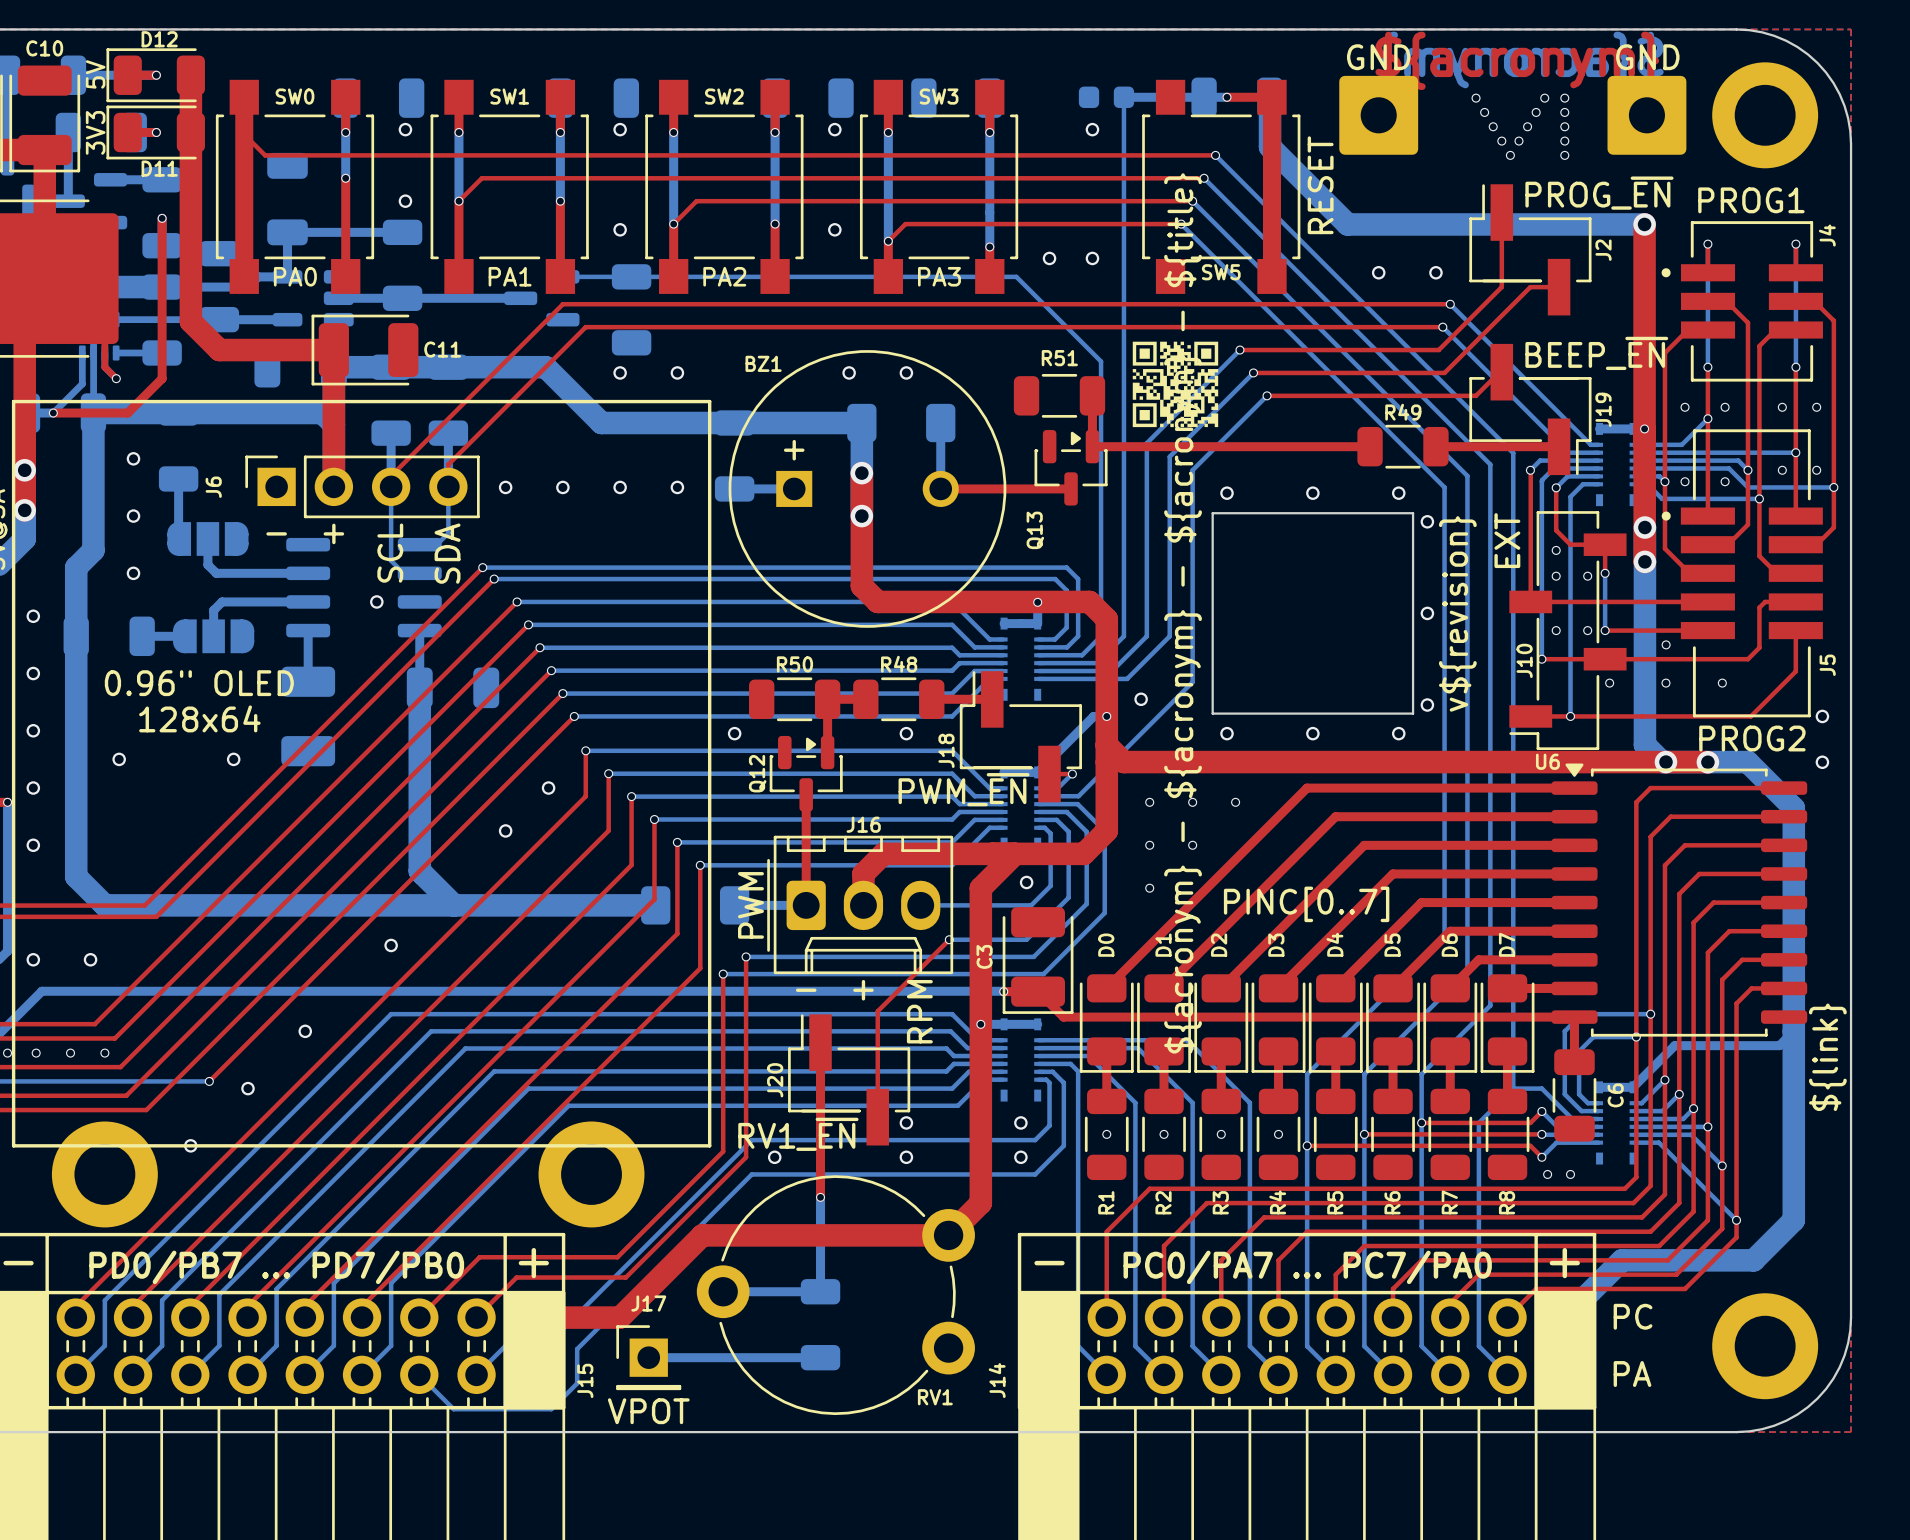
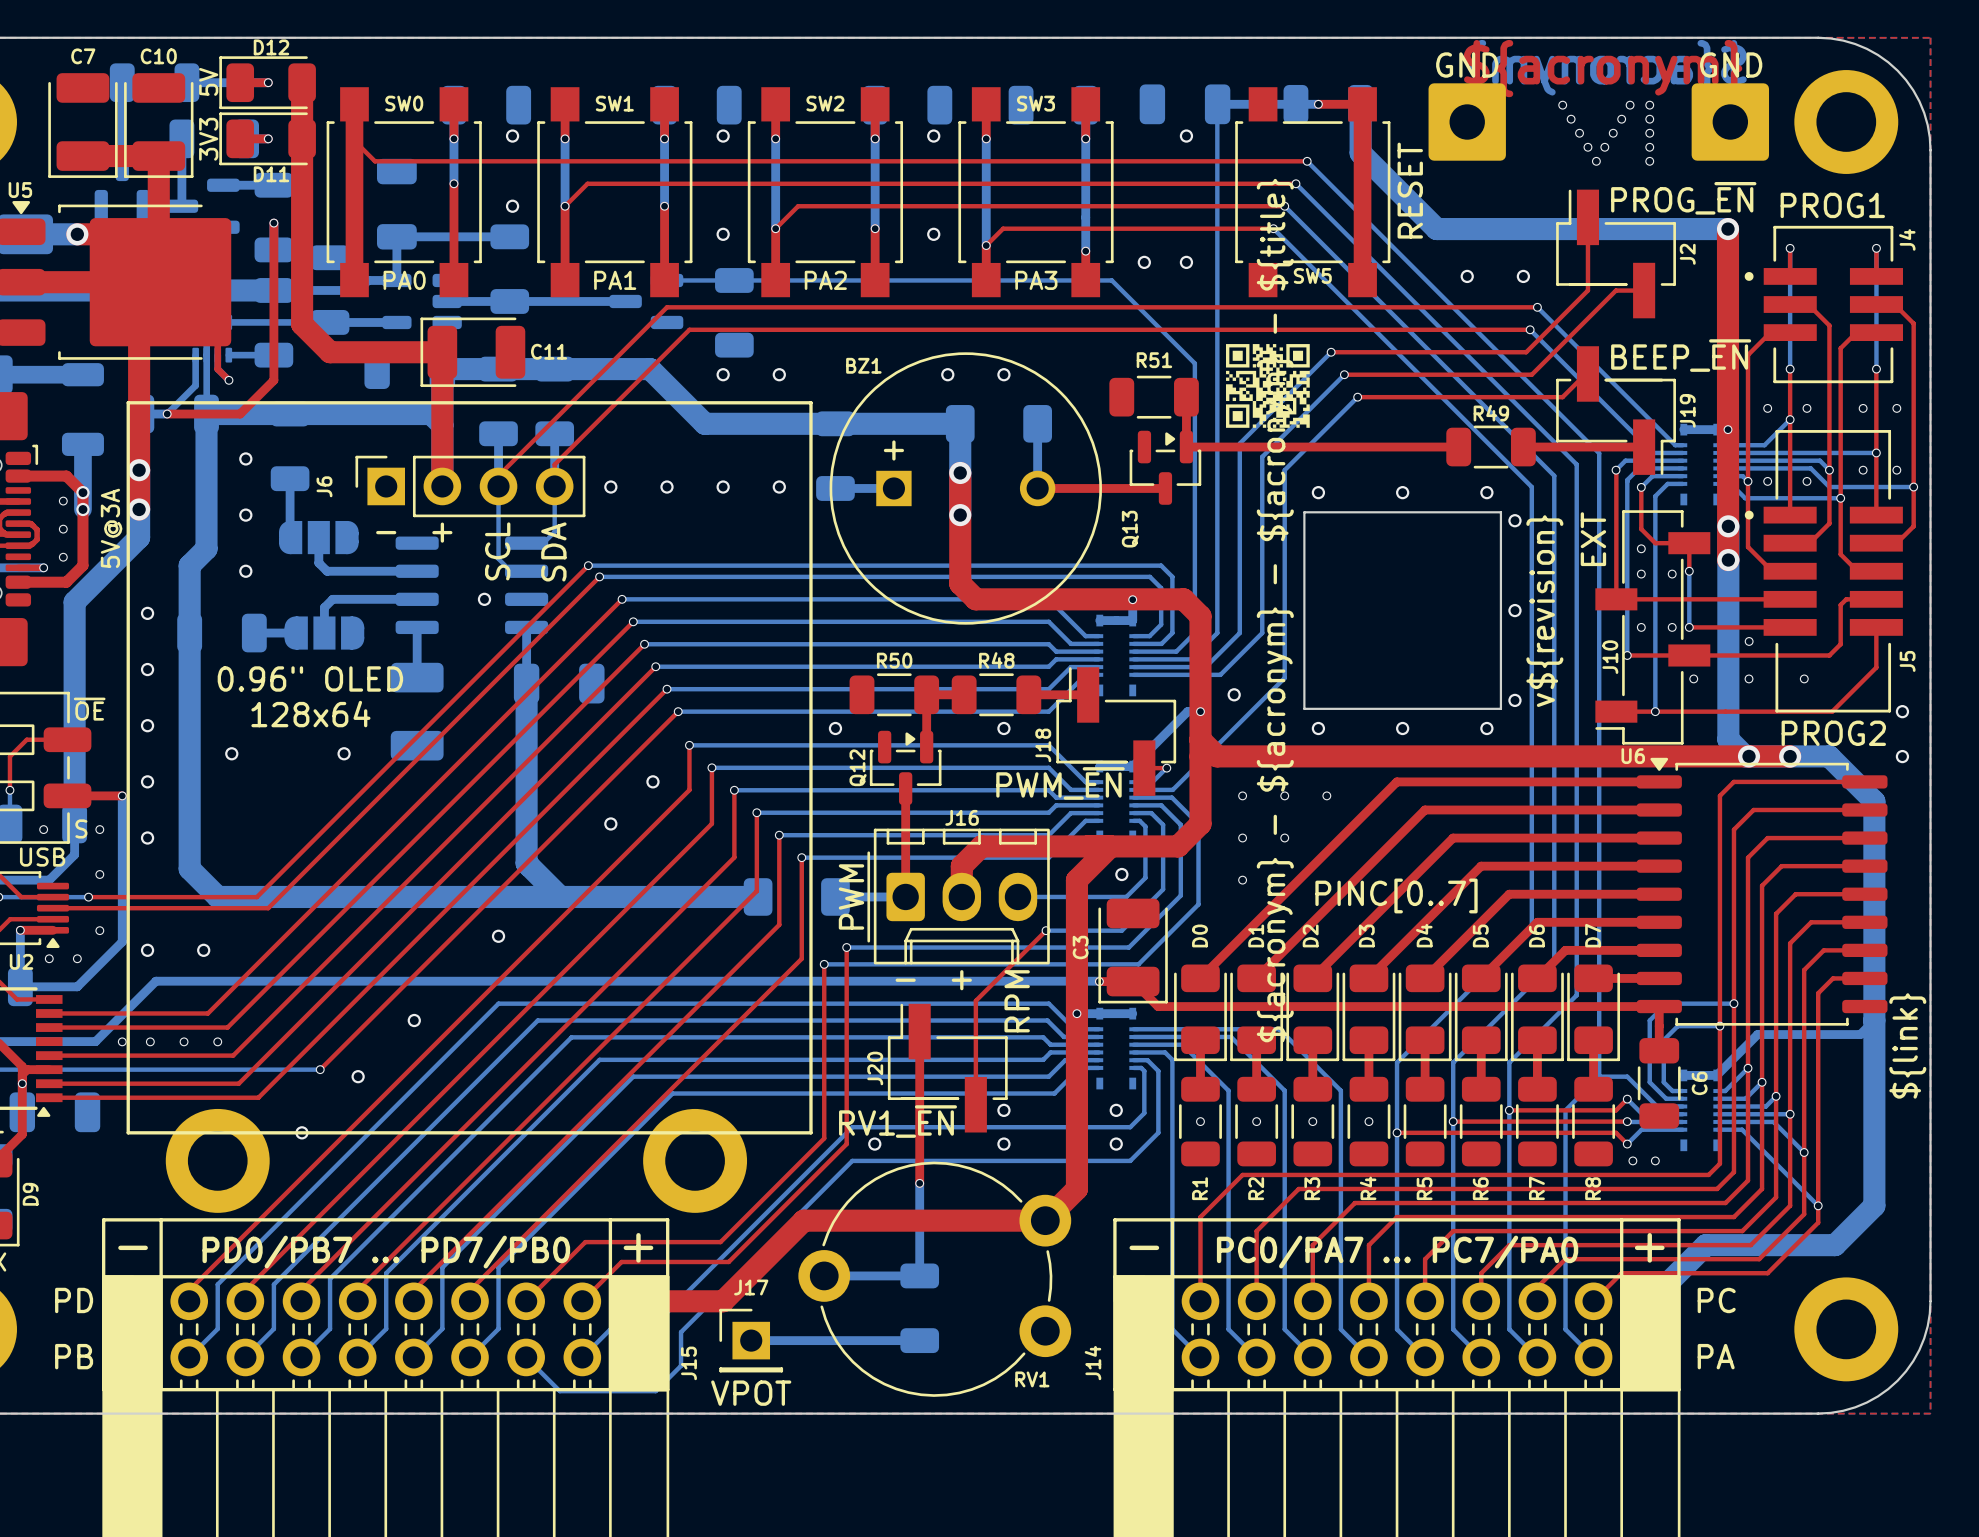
part footprint: [1078, 86, 1135, 108] -> [1139, 84, 1231, 125]

